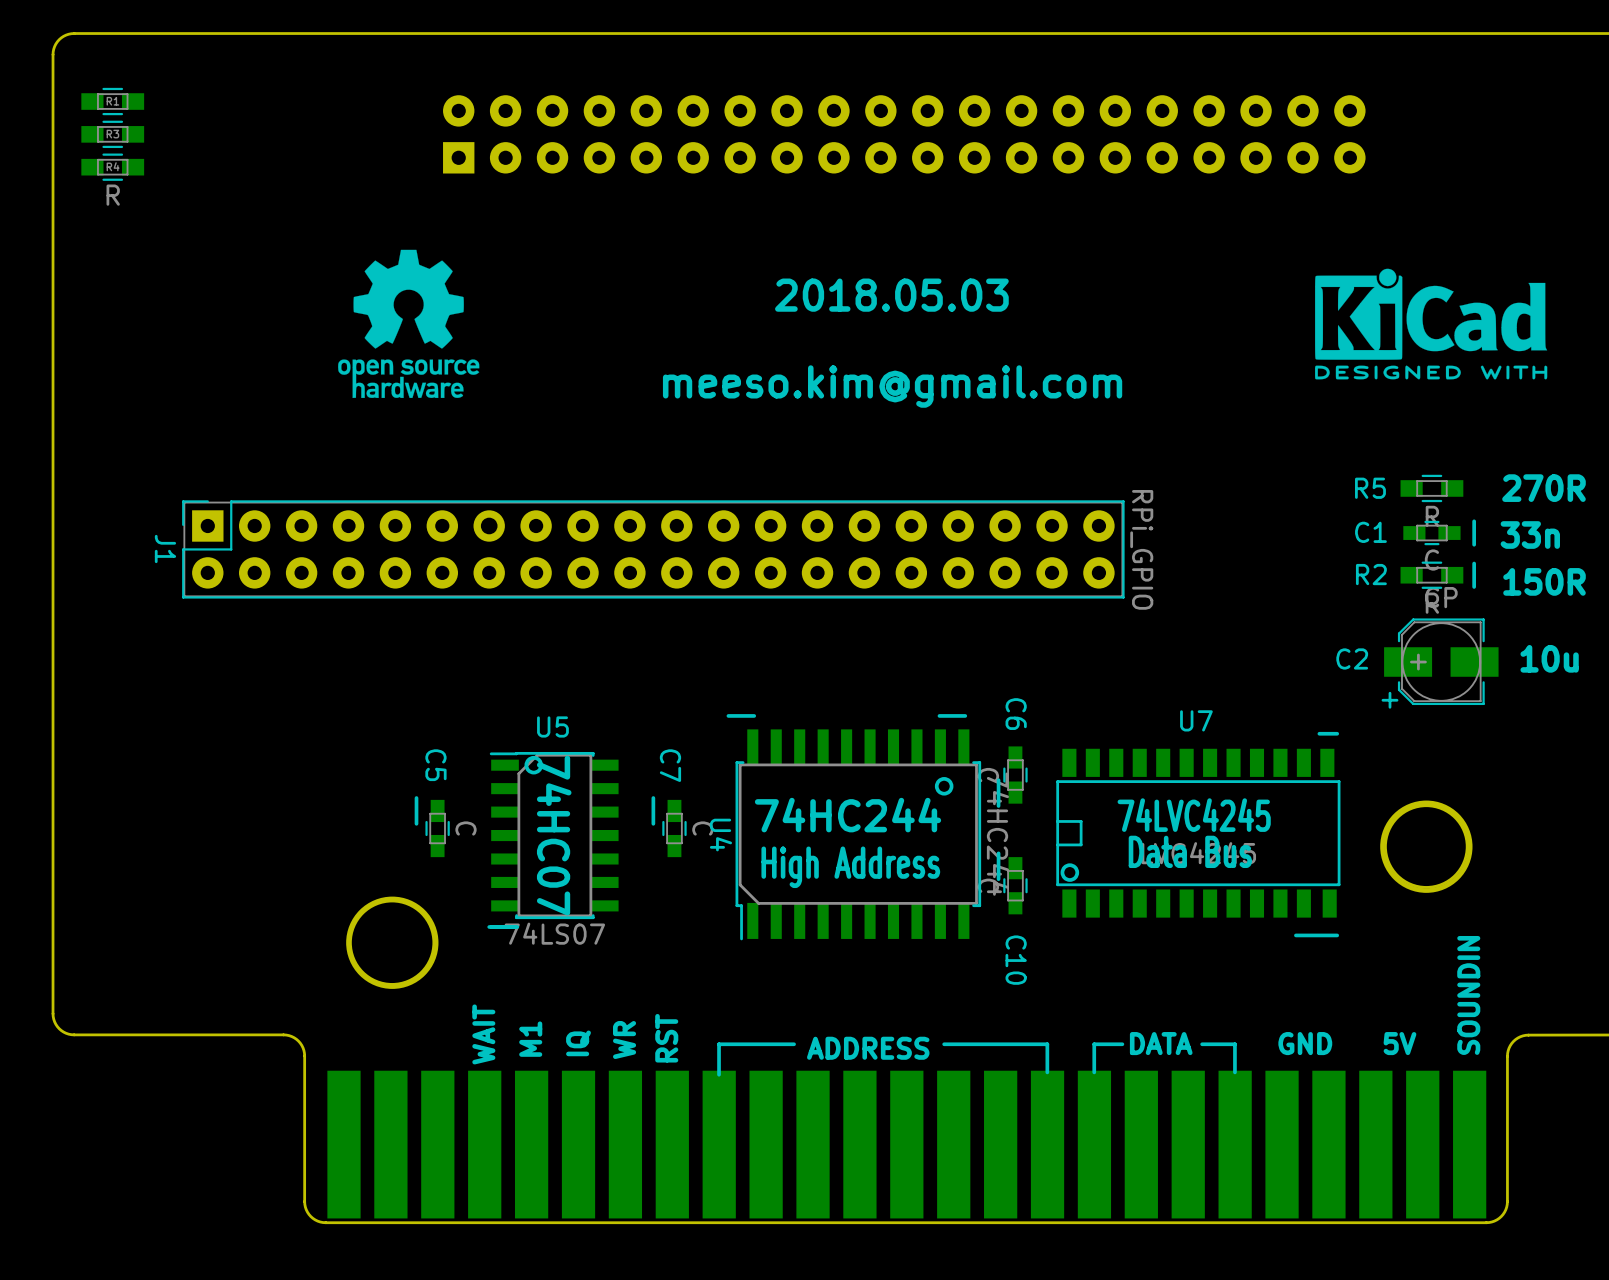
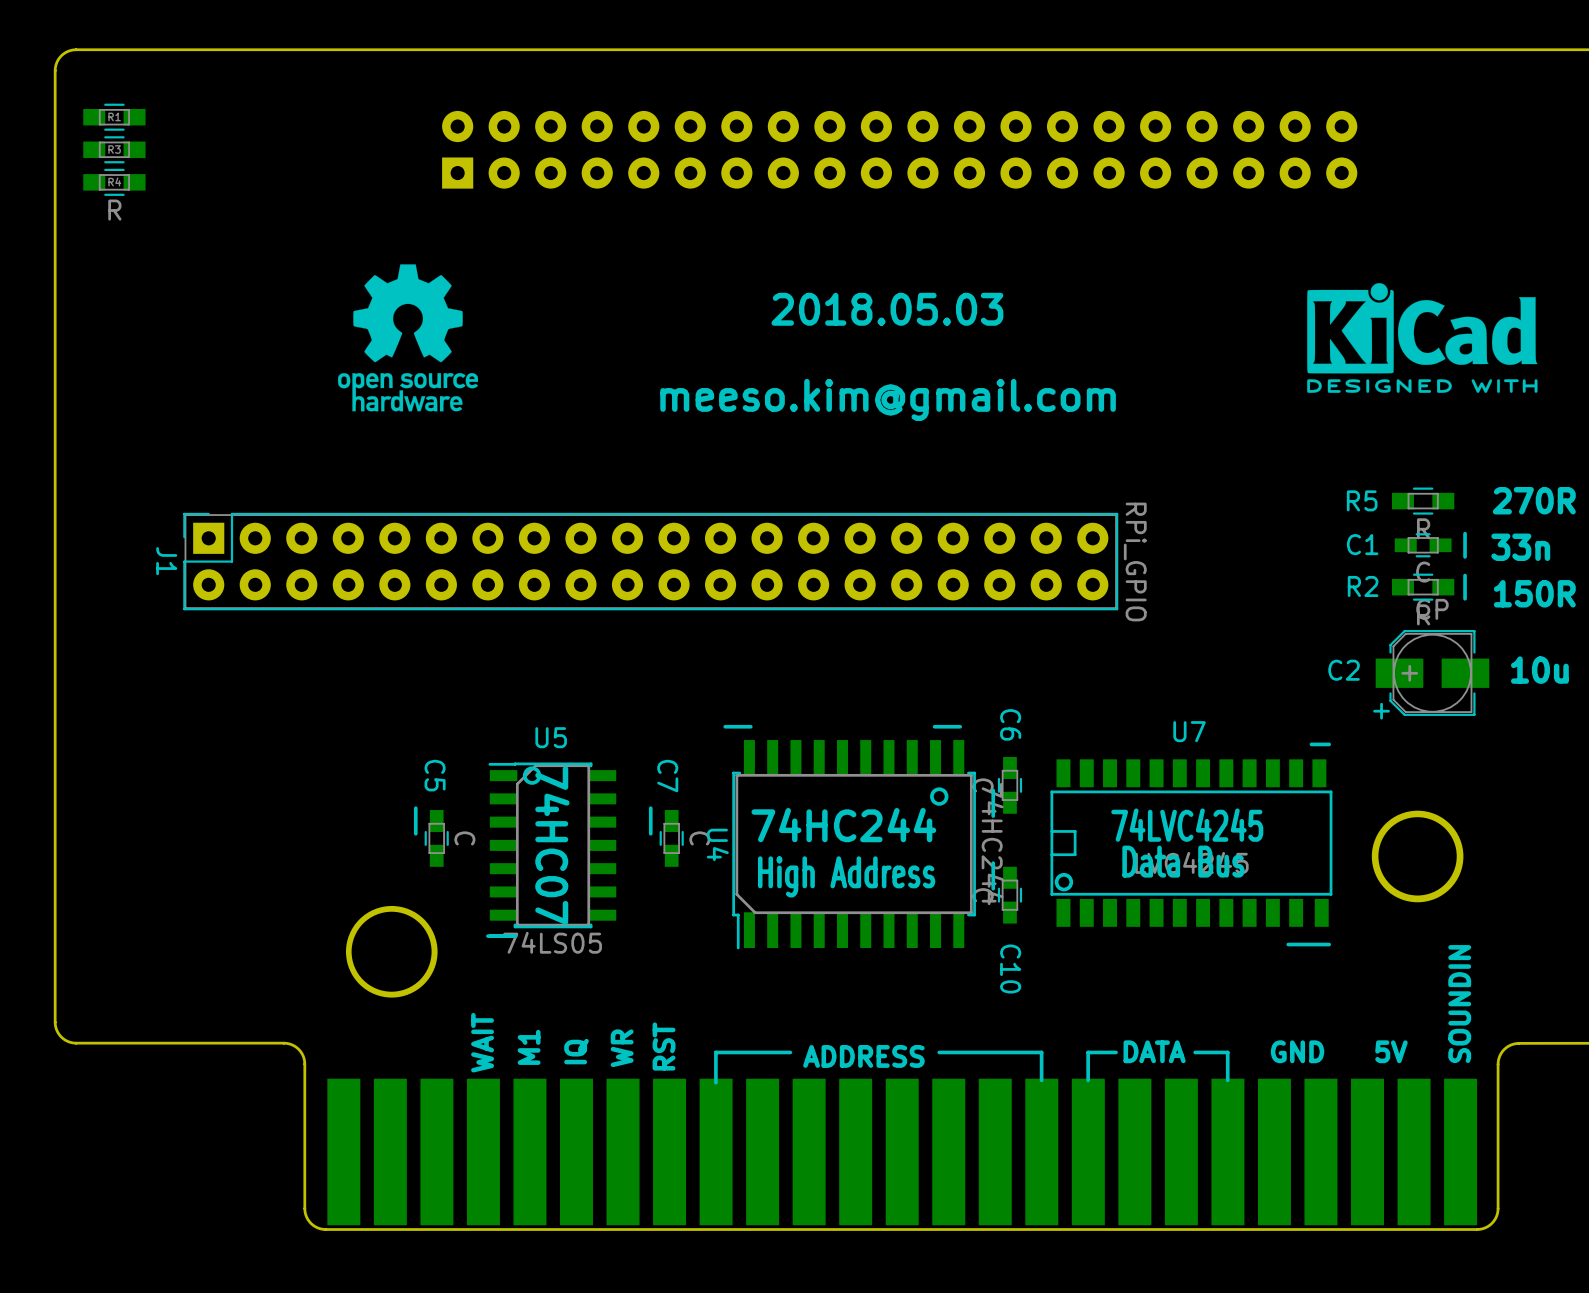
U5 value: 74LS07 (554, 933) -> 74LS05 (552, 942)

